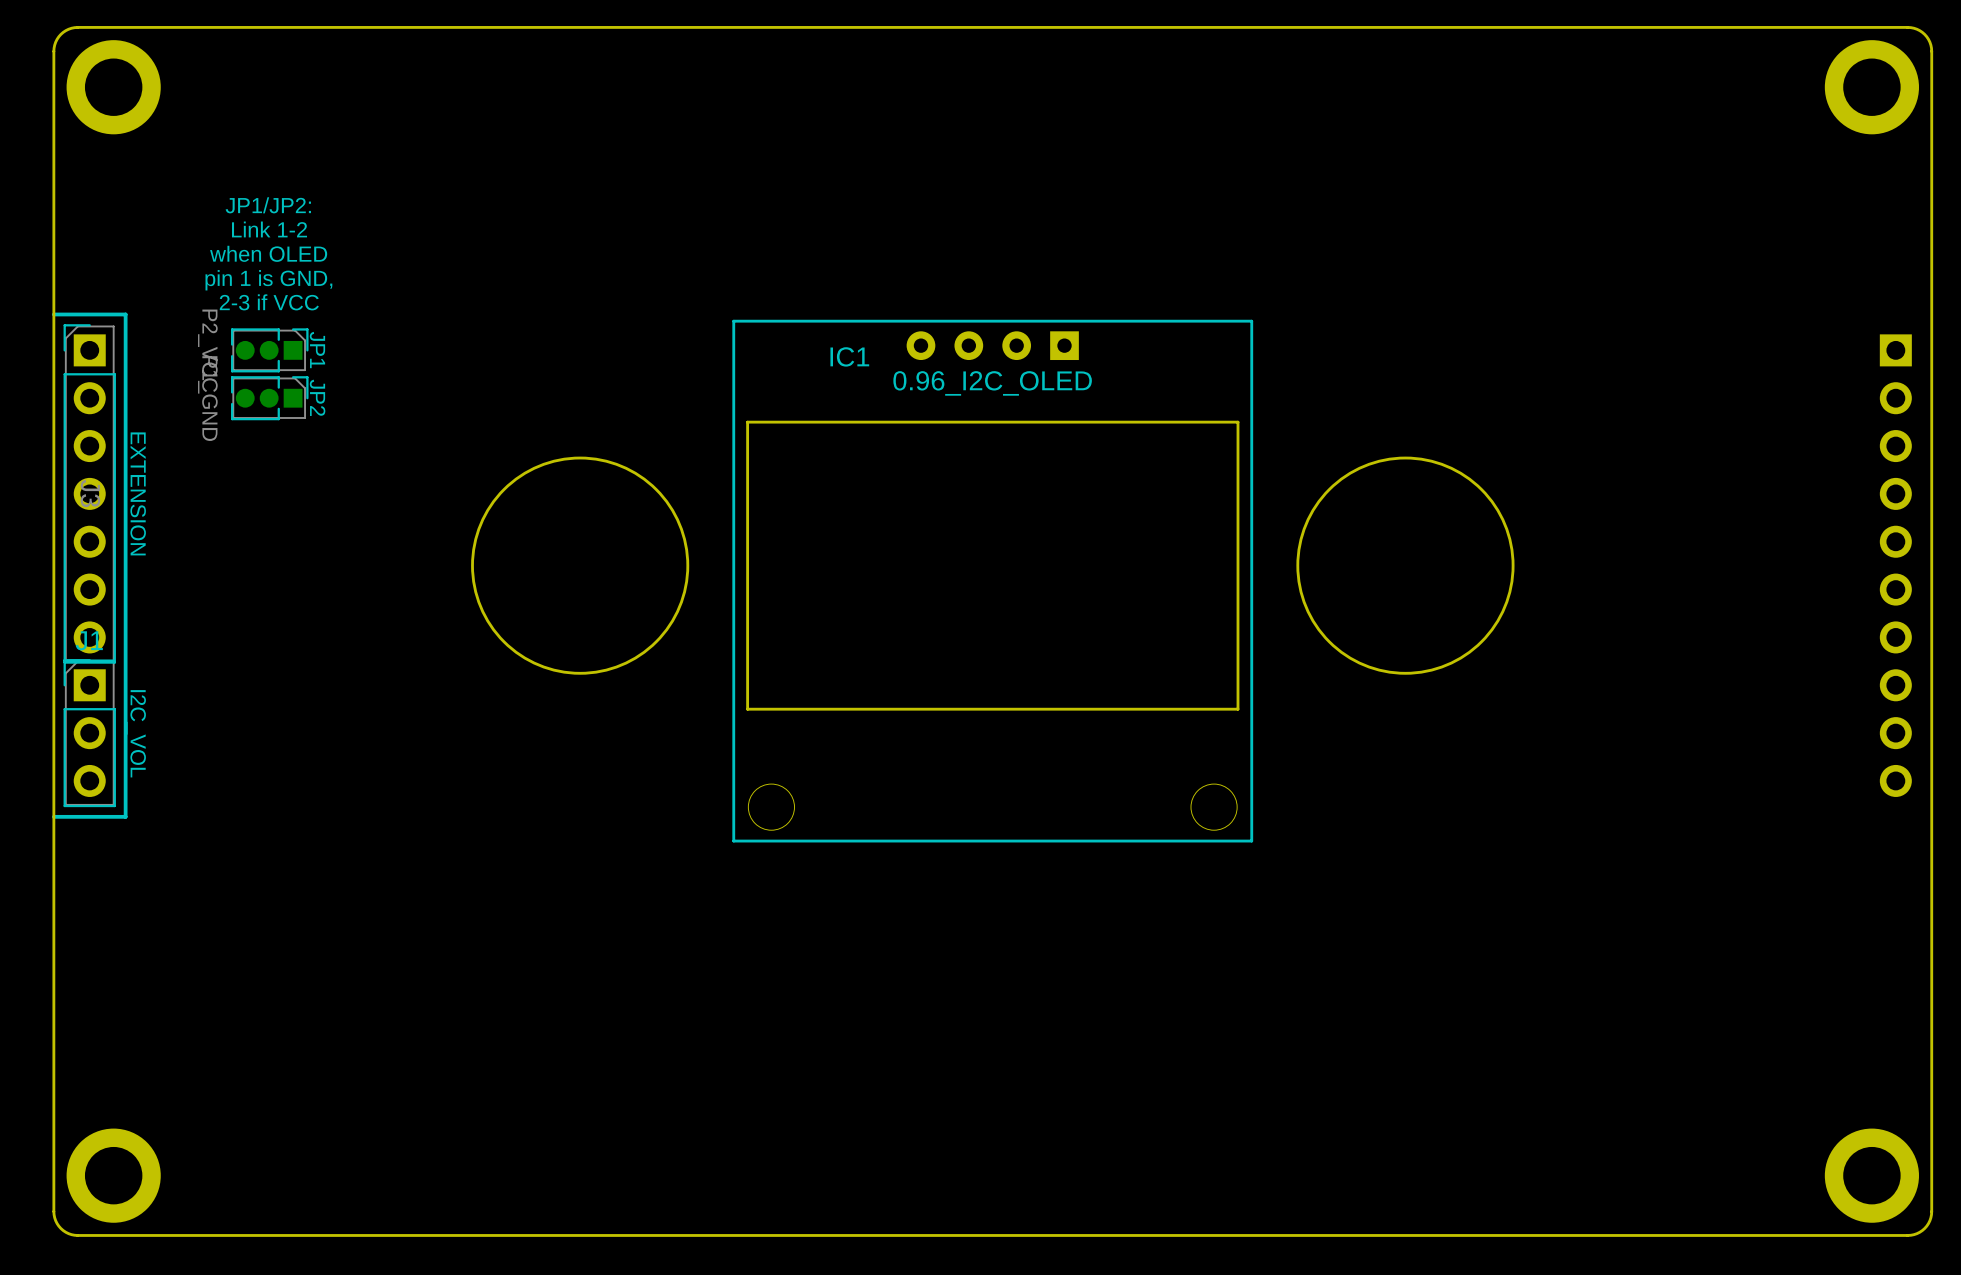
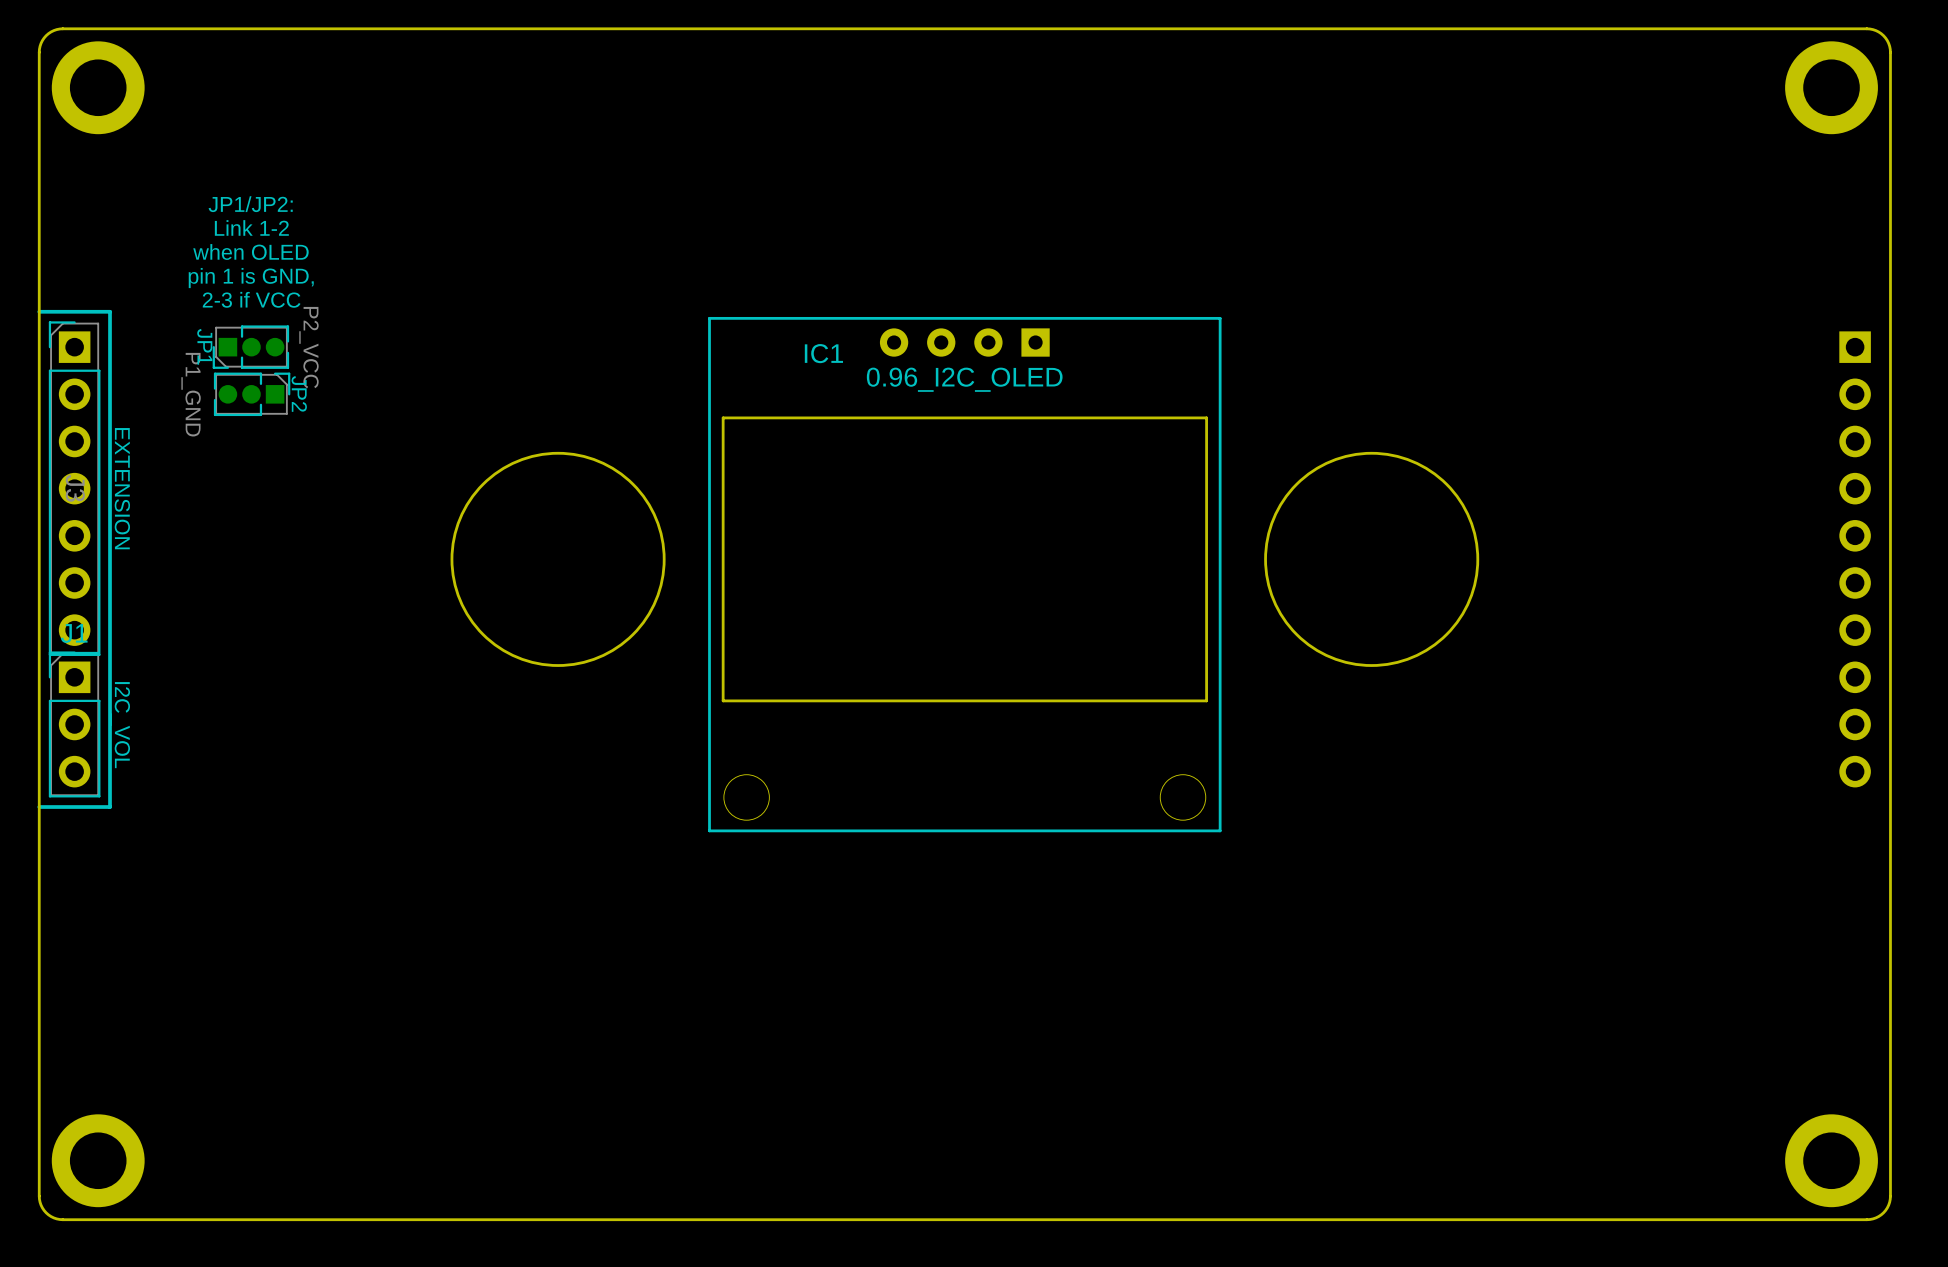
JP1 rotation: 0° (269, 350) -> 180° (250, 347)

